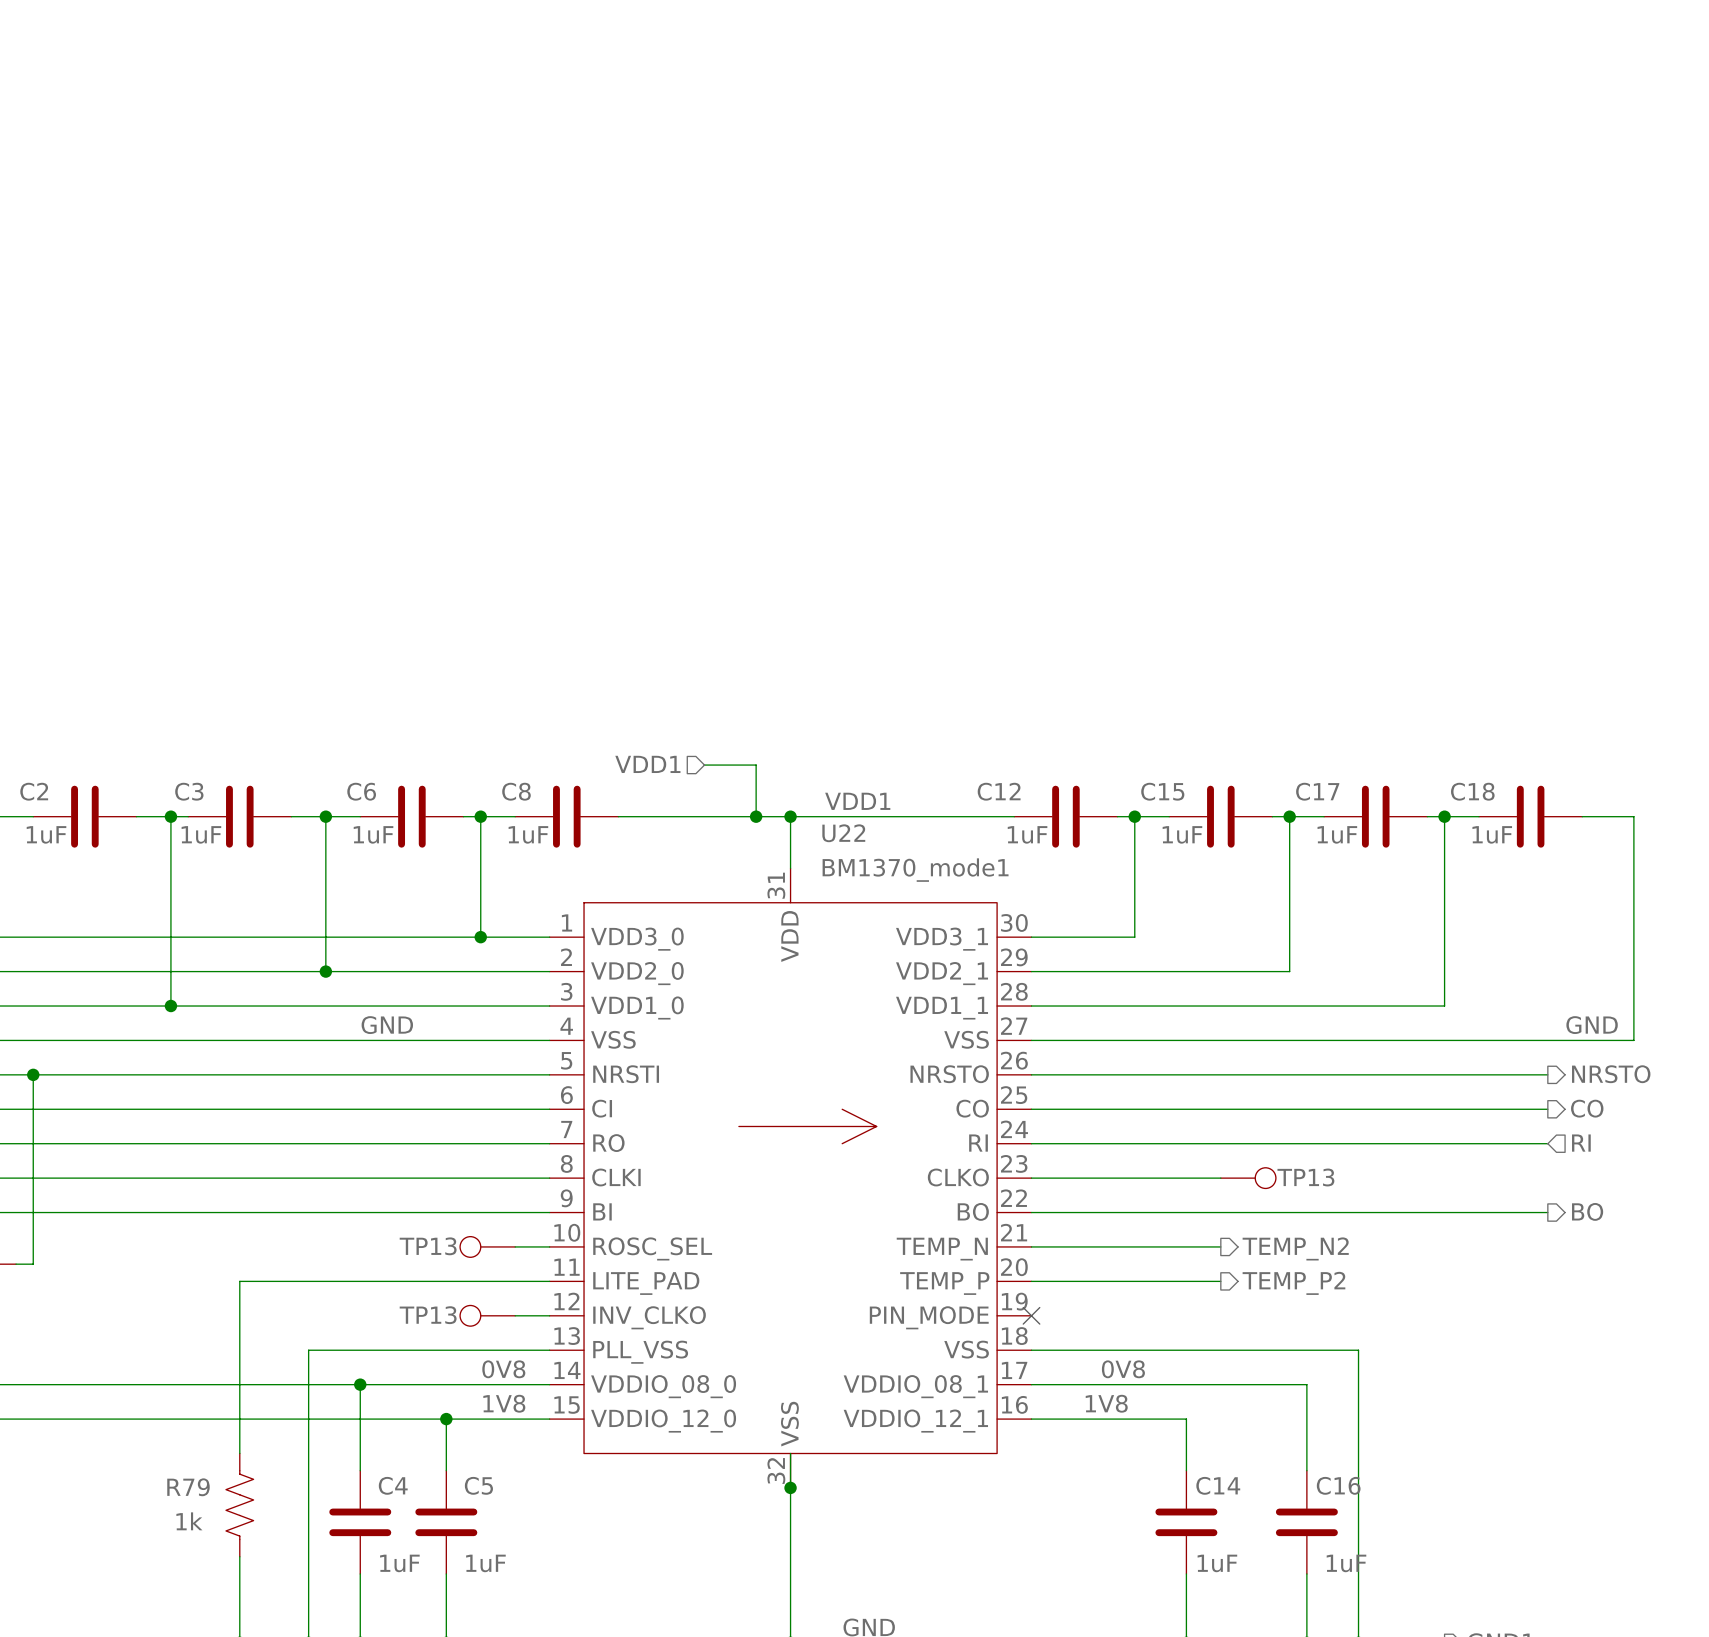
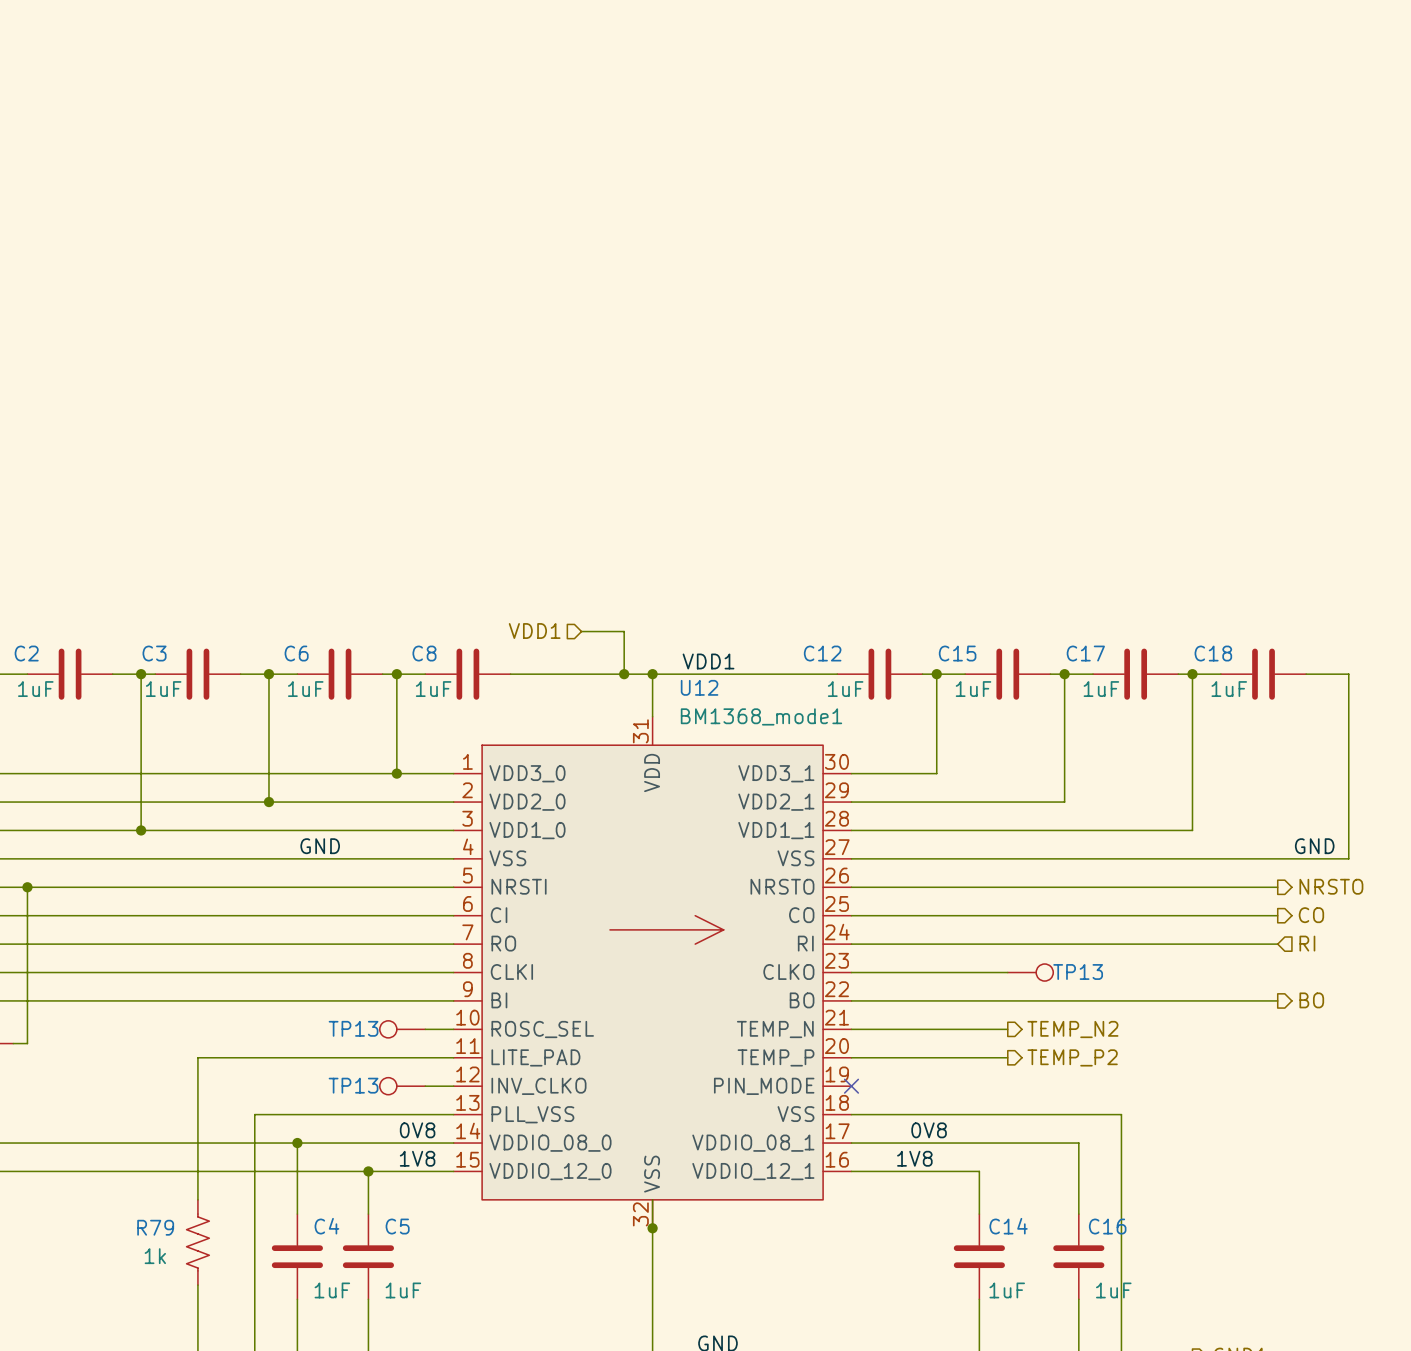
U22 name: U22 (843, 833) -> U12 (699, 687)
U22 value: BM1370_mode1 (915, 870) -> BM1368_mode1 (761, 716)

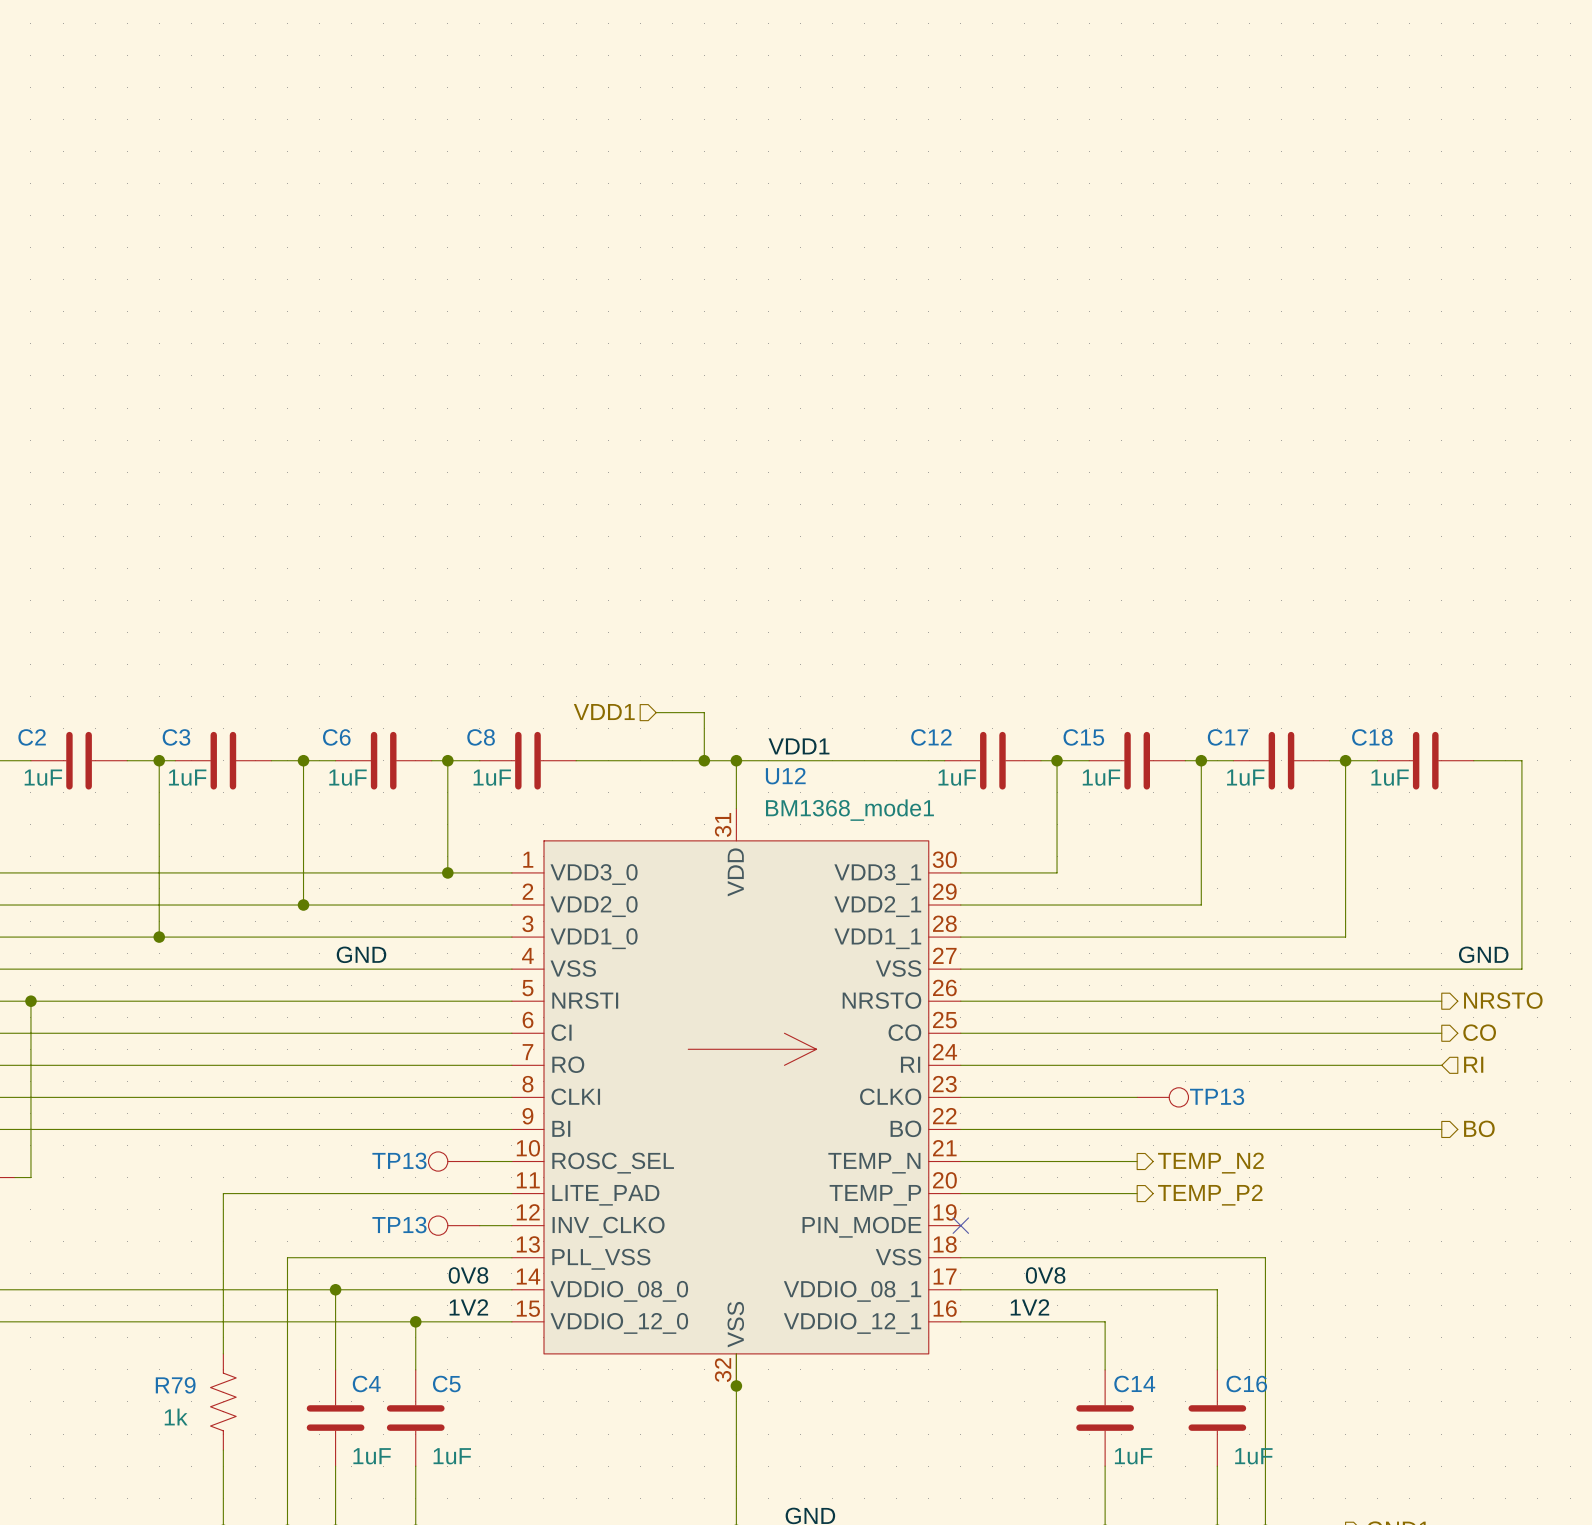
label: 1V8 (417, 1158) -> 1V2 (468, 1307)
label: 1V8 (914, 1158) -> 1V2 (1029, 1307)

